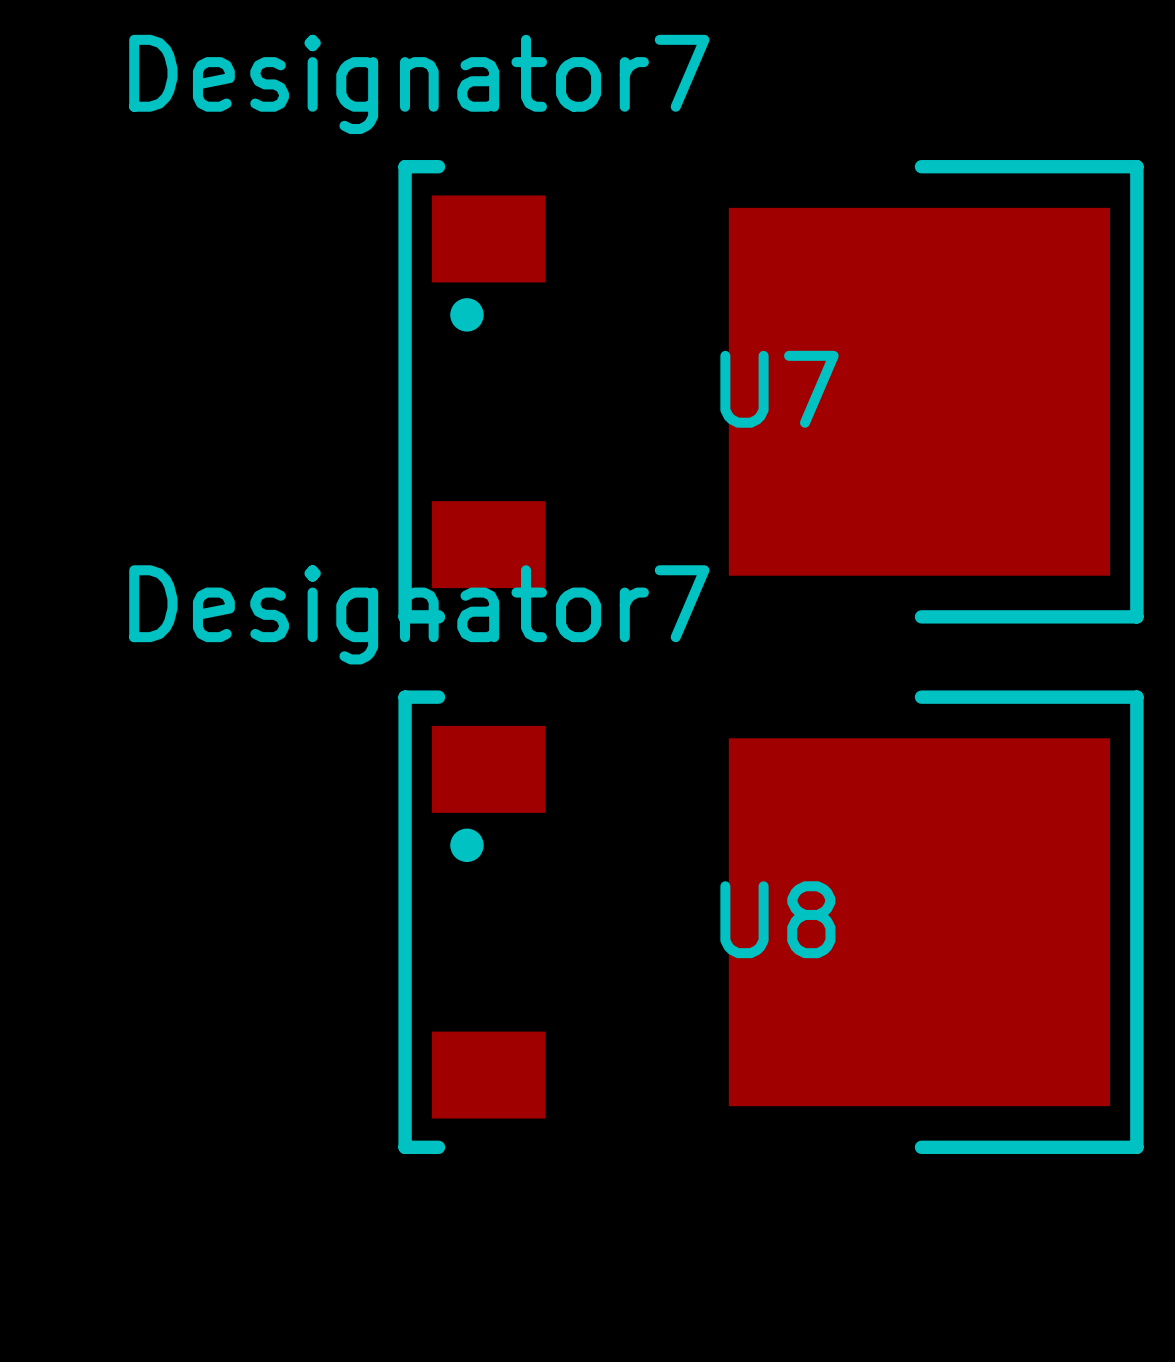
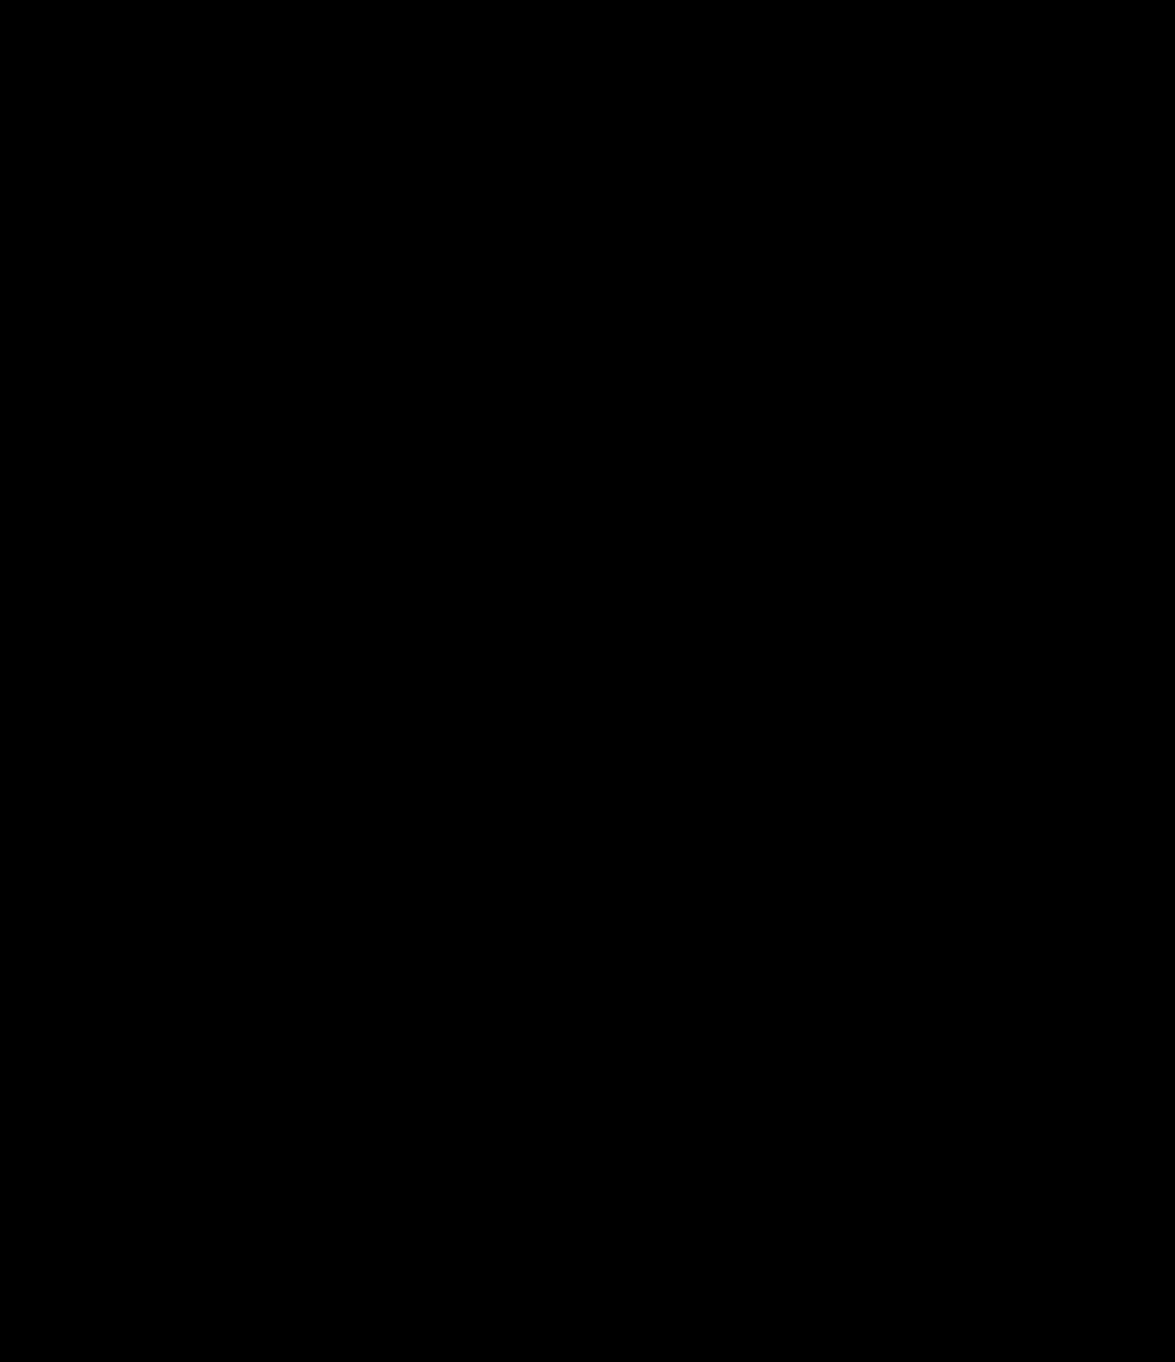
U7: (770, 391) -> none
U8: (770, 922) -> none

